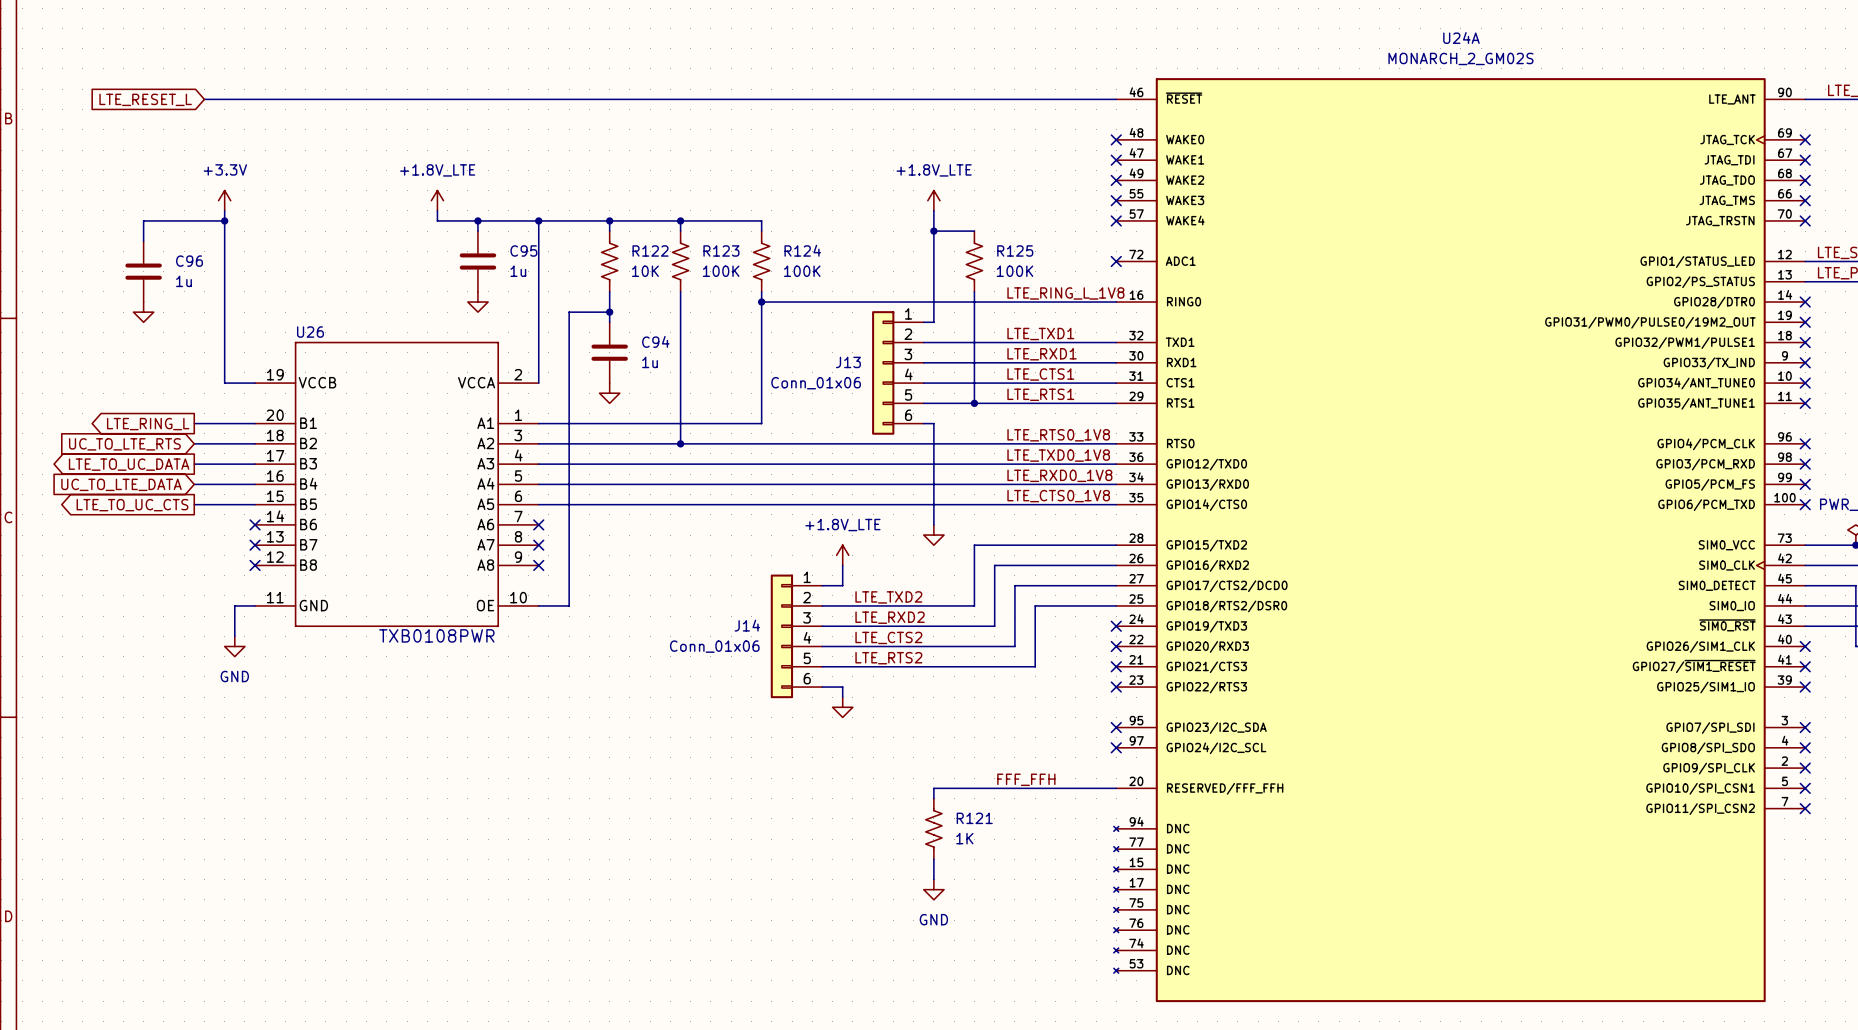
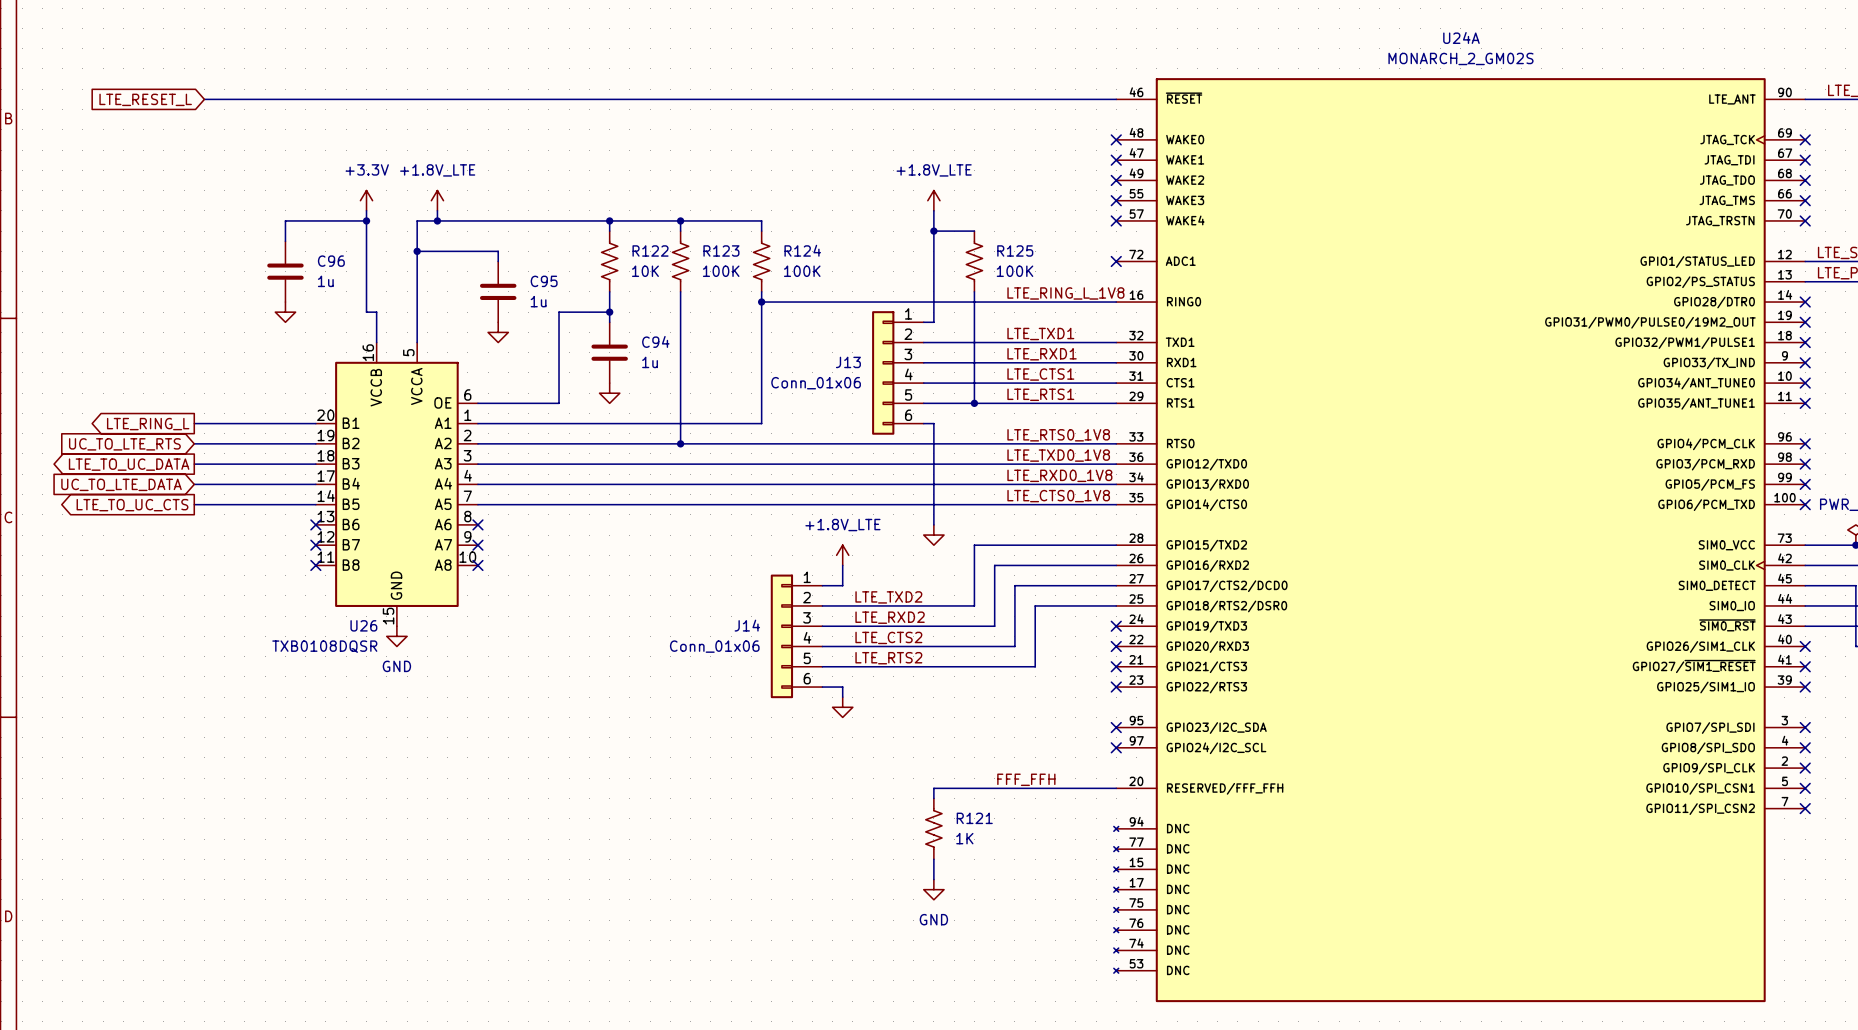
power symbol position: +3.3V (224, 200) -> +3.3V (366, 200)
wire: (224, 210) (224, 383) (255, 383) -> none
wire: none -> (366, 210) (366, 312) (376, 312) (376, 342)
wire: (224, 220) (143, 220) (143, 241) -> (366, 220) (285, 220) (285, 241)
junction: (224, 220) -> none
junction: none -> (366, 220)
wire: none -> (437, 220) (417, 220) (417, 342)
junction: none -> (437, 220)
wire: (477, 220) (477, 231) -> none
junction: (477, 220) -> none
wire: (538, 220) (538, 383) -> none
junction: (538, 220) -> none
wire: none -> (417, 251) (498, 251) (498, 261)
junction: none -> (417, 251)
C95 position: (477, 261) -> (498, 291)
C96 position: (143, 271) -> (285, 271)
power symbol position: (477, 302) -> (498, 332)
power symbol: (143, 312) -> none
power symbol: none -> (285, 312)
wire: (569, 312) (569, 605) (538, 605) -> (569, 312) (559, 312) (559, 403) (477, 403)
U26 name position: U26 (310, 332) -> U26 (363, 625)
U26 symbol: [255, 341, 539, 628] -> [315, 342, 478, 627]
no-connect mark: (255, 524) -> none
no-connect mark: none -> (315, 524)
no-connect mark: none -> (477, 524)
no-connect mark: (538, 524) -> none
no-connect mark: (255, 545) -> none
no-connect mark: none -> (315, 545)
no-connect mark: none -> (477, 545)
no-connect mark: (538, 545) -> none
no-connect mark: (255, 565) -> none
no-connect mark: none -> (315, 565)
no-connect mark: none -> (477, 565)
no-connect mark: (538, 565) -> none
wire: (255, 605) (234, 605) (234, 636) -> none
U26 value: TXB0108PWR (436, 635) -> TXB0108DQSR (324, 646)
power symbol position: GND (234, 646) -> GND (396, 636)

